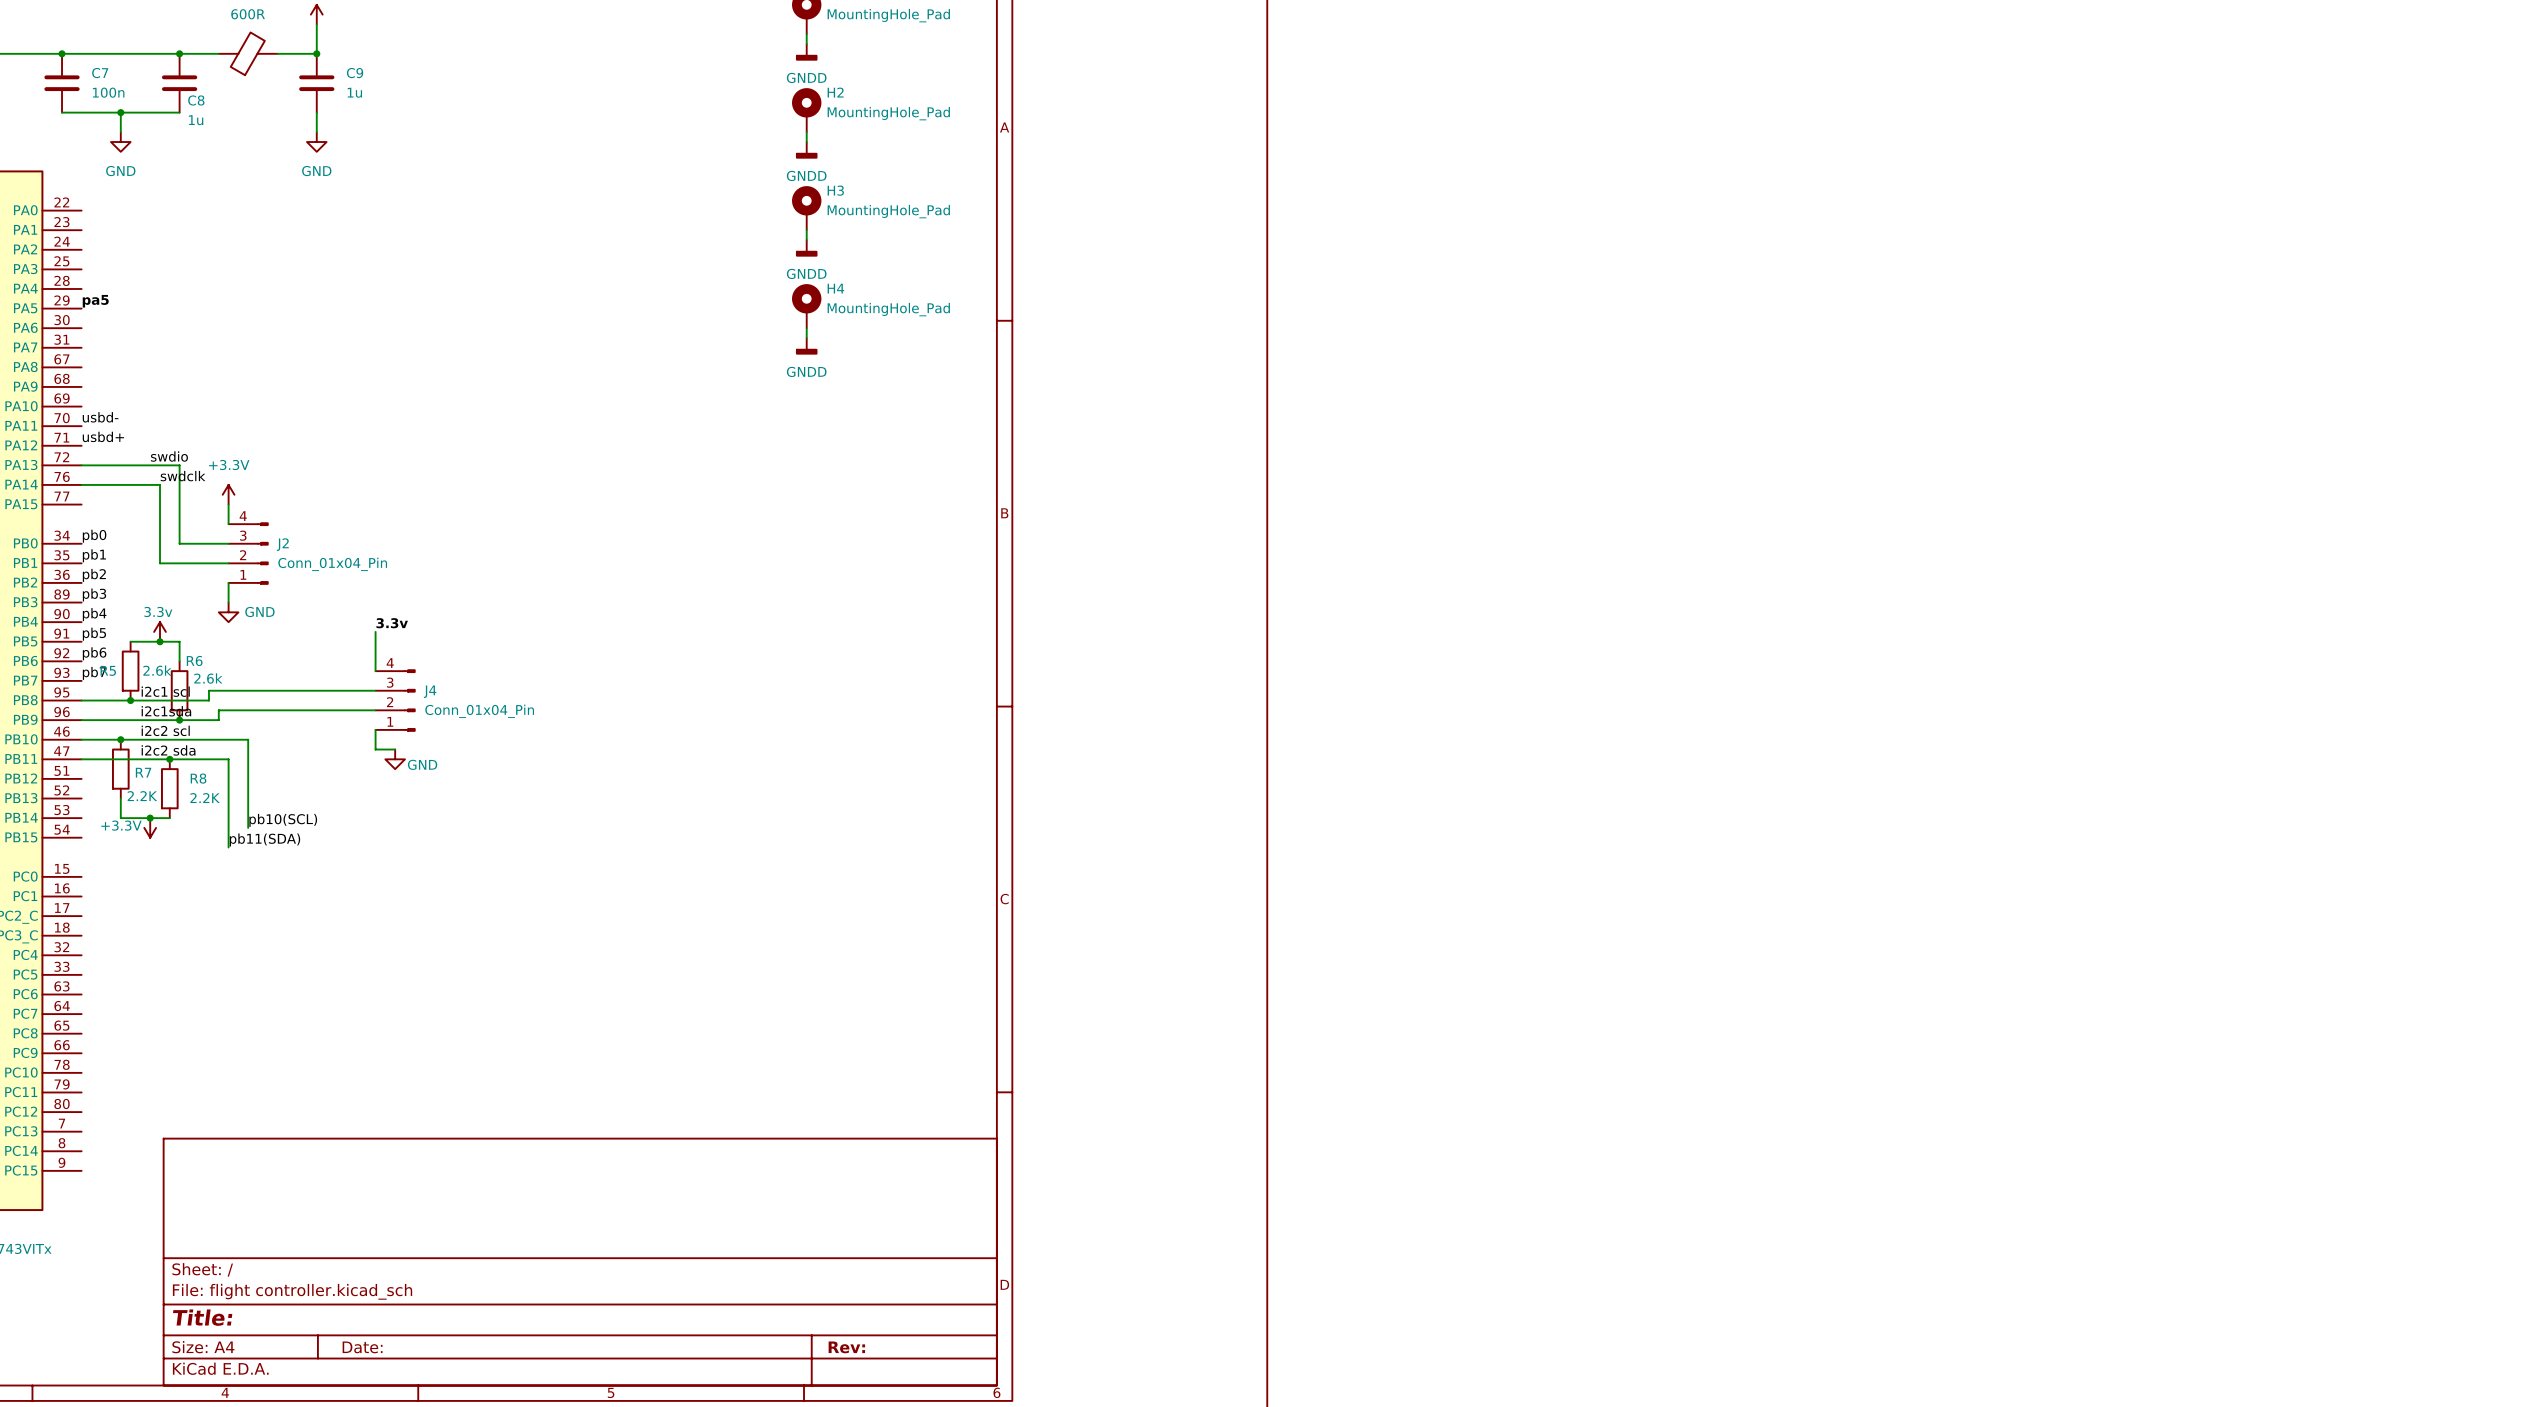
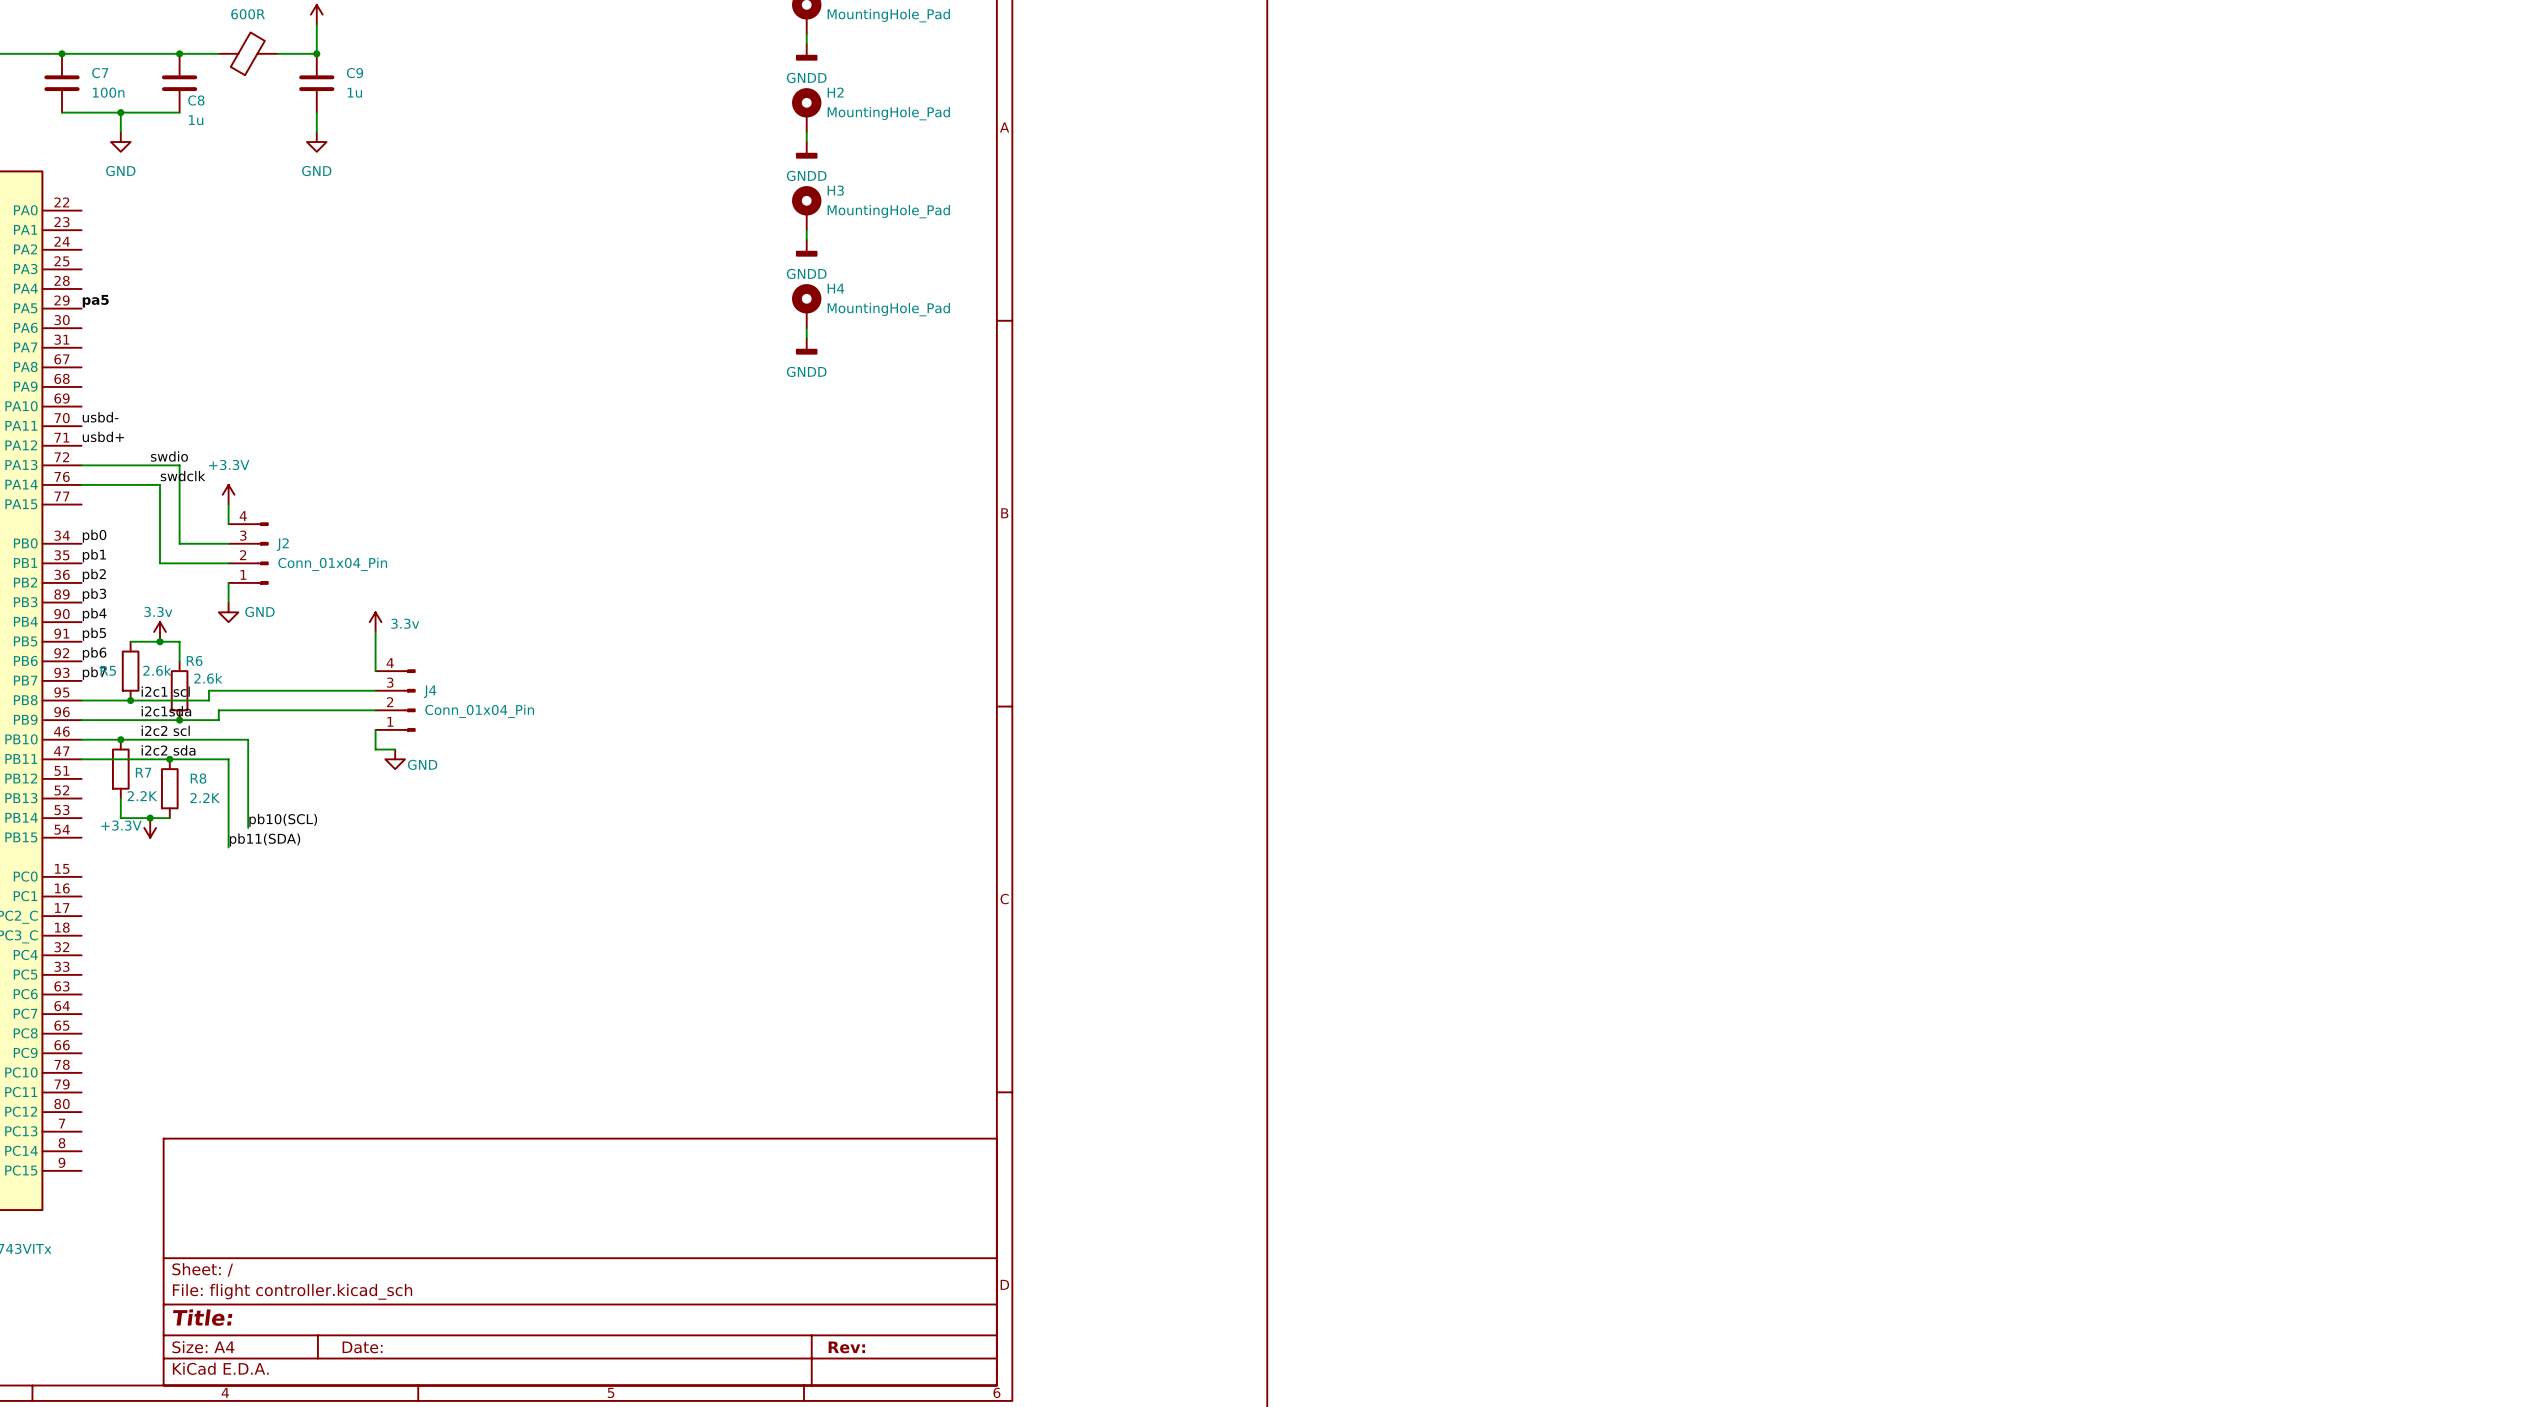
power symbol: none -> 3.3v (375, 622)
label: 3.3v (392, 623) -> none

